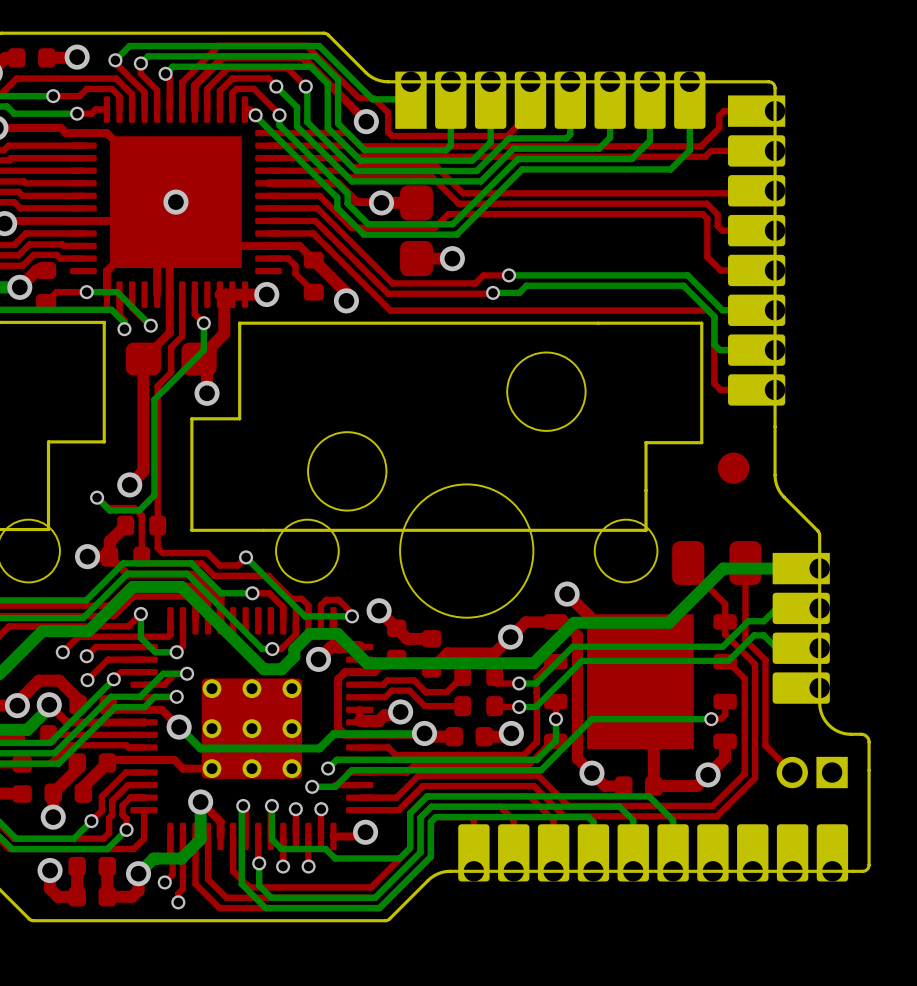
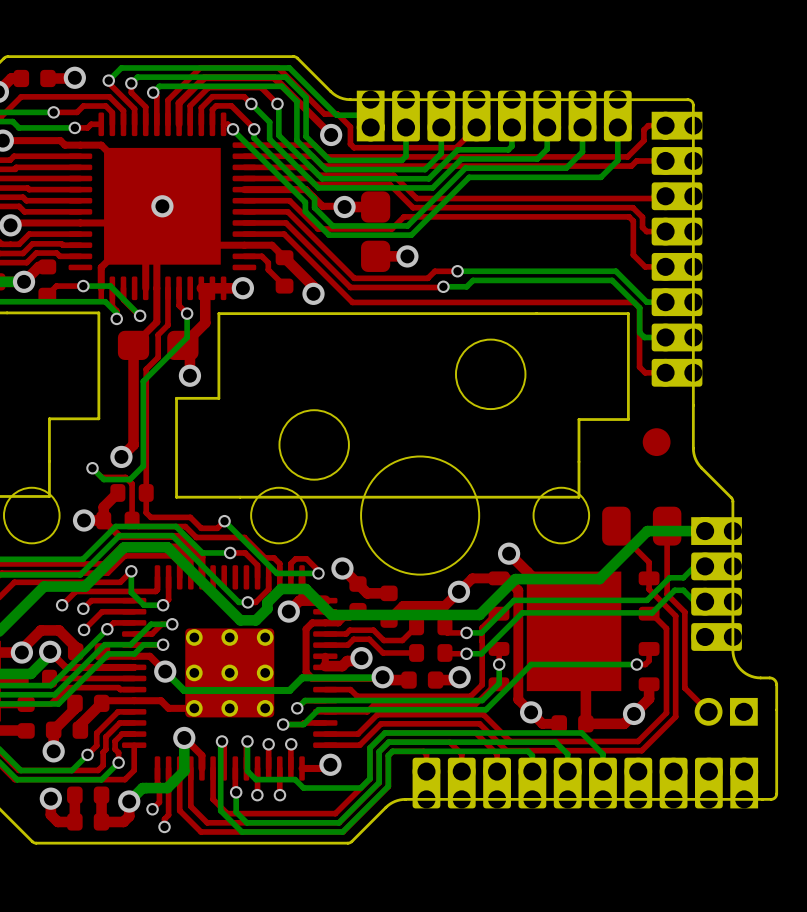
part footprint: [395, 71, 706, 129] -> [356, 90, 632, 142]
part footprint: [728, 95, 786, 406] -> [651, 111, 703, 387]
part footprint: [772, 552, 830, 704] -> [691, 517, 742, 651]
part footprint: [458, 824, 849, 882] -> [412, 757, 759, 809]

